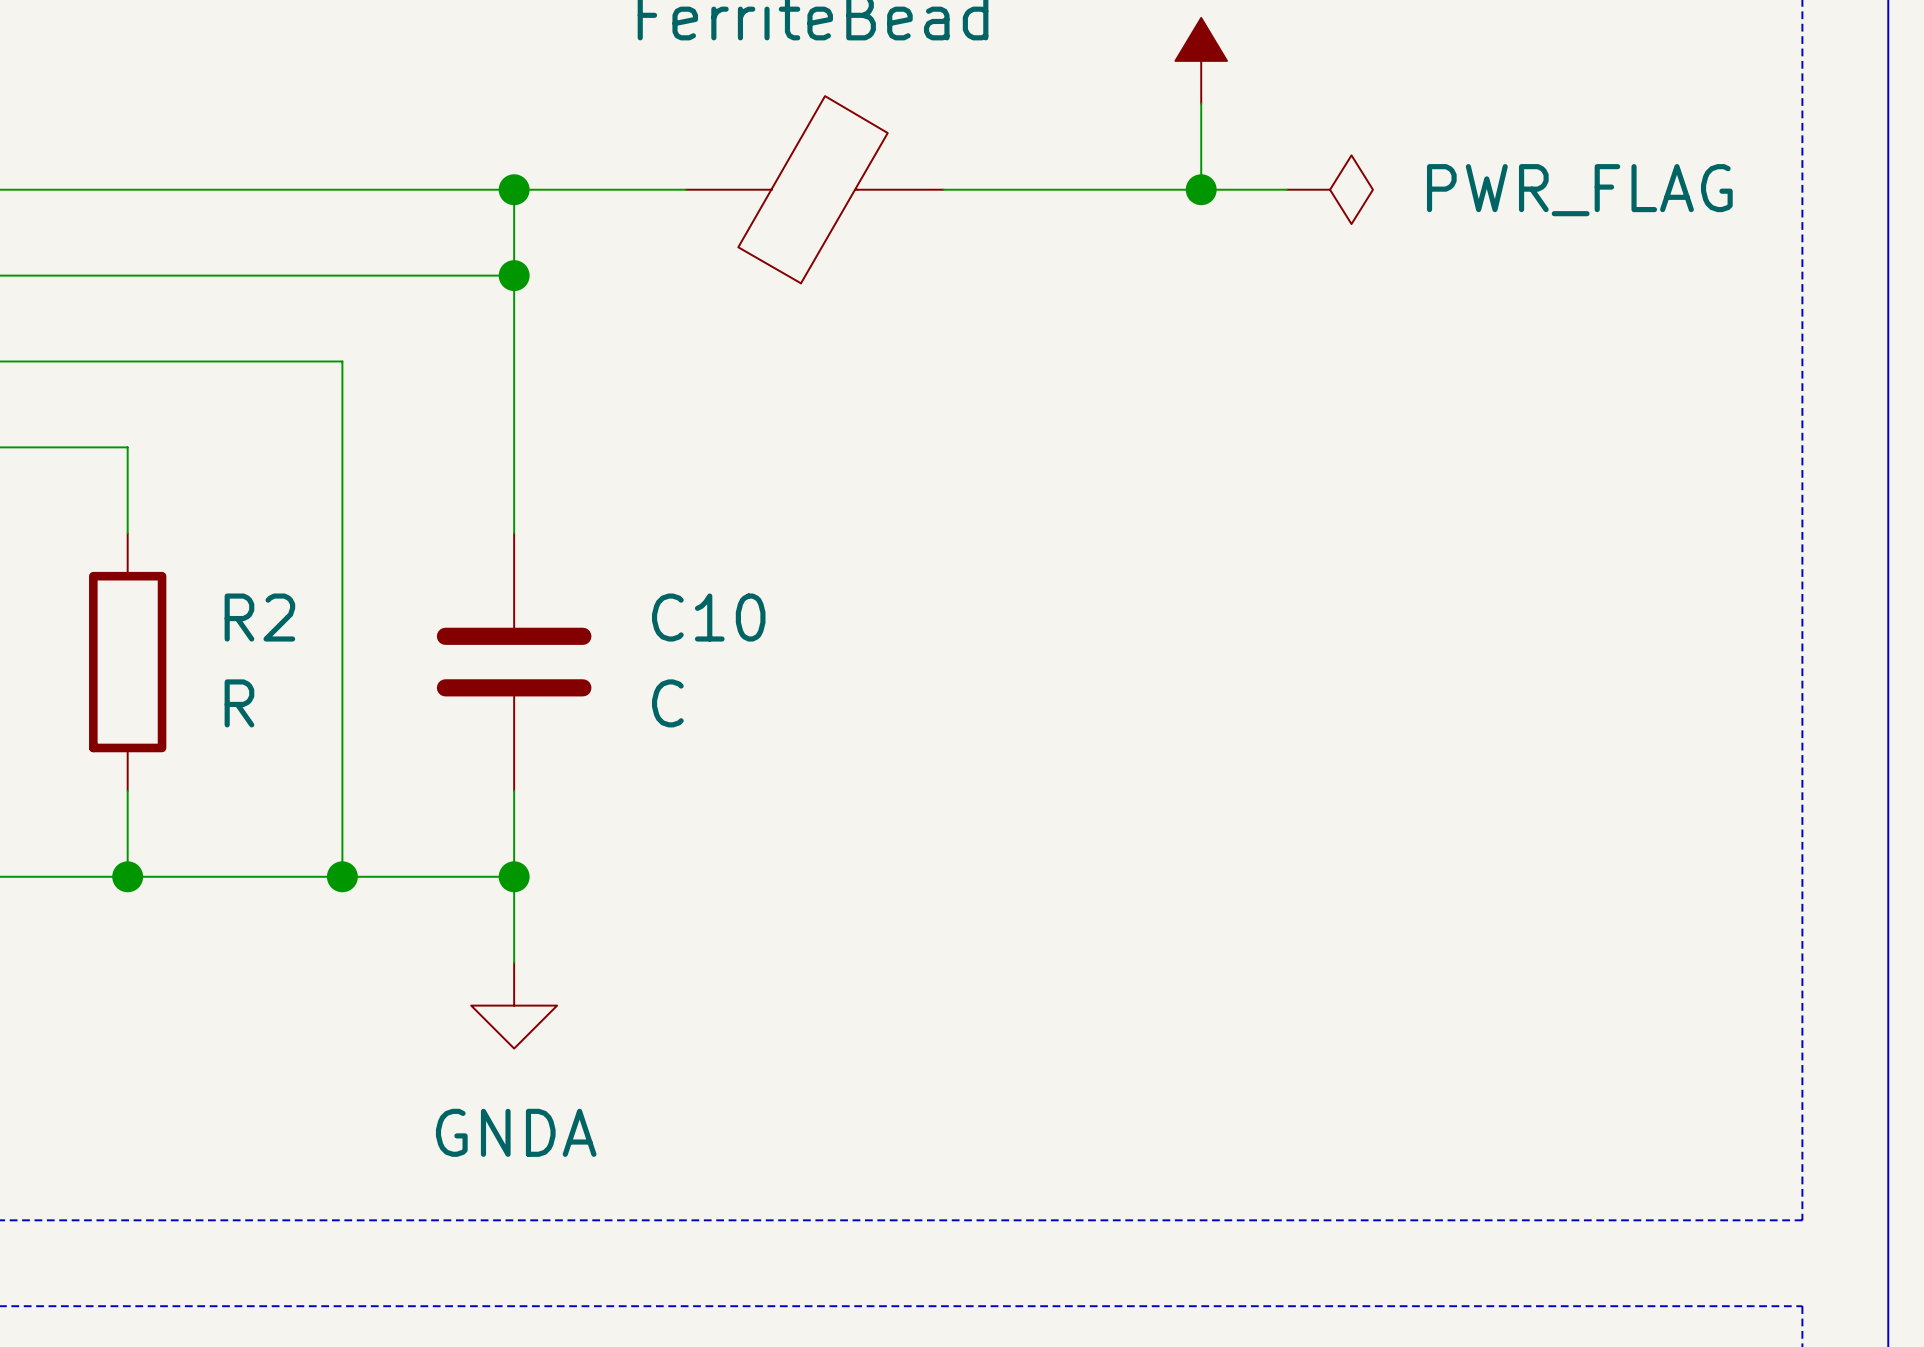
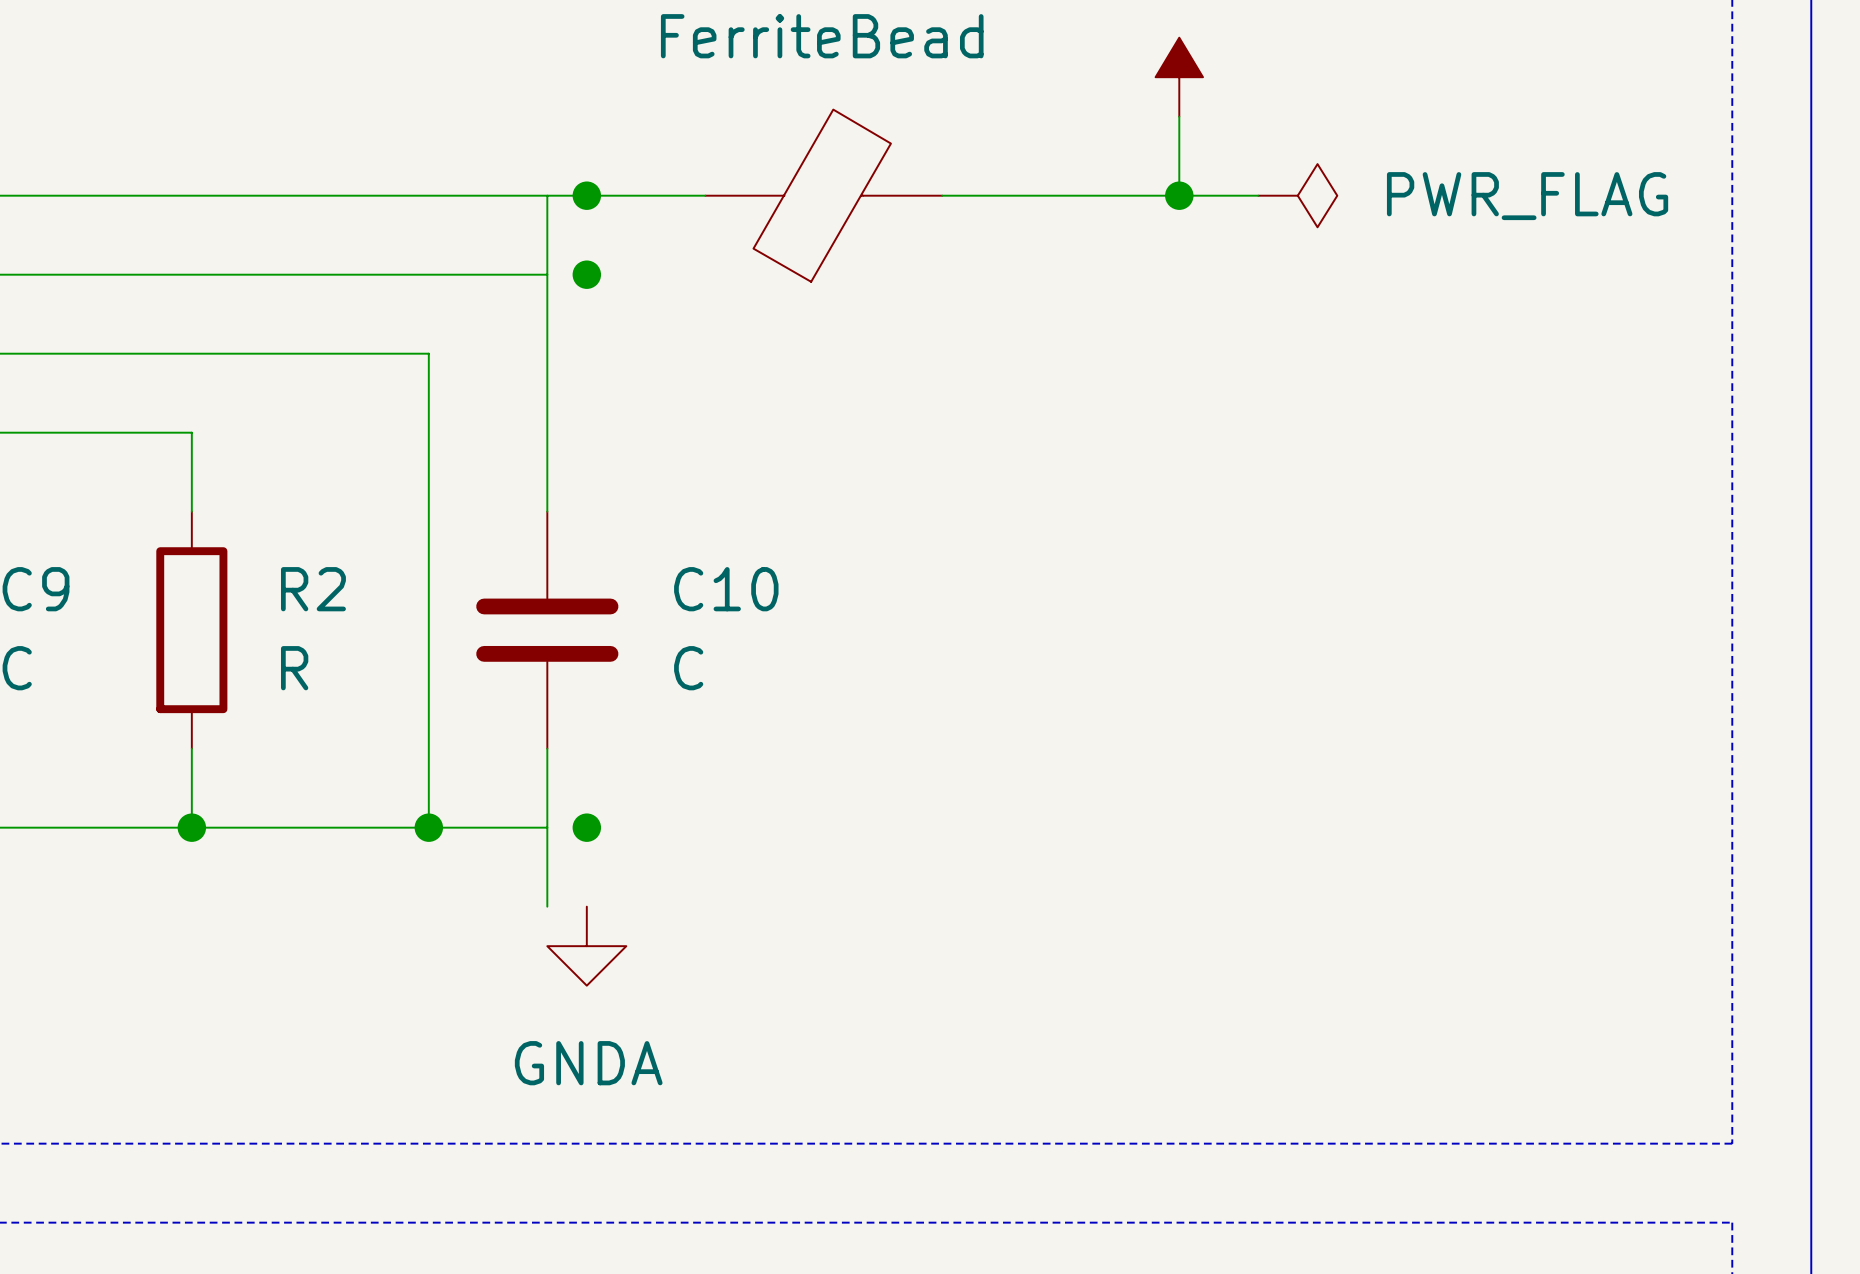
junction position: (514, 189) -> (586, 195)
junction position: (514, 275) -> (586, 274)
wire: (342, 361) (342, 876) -> (389, 353) (428, 353) (428, 827)
junction position: (342, 876) -> (428, 827)
junction position: (514, 876) -> (586, 827)
power symbol position: GNDA (514, 1005) -> GNDA (586, 946)

